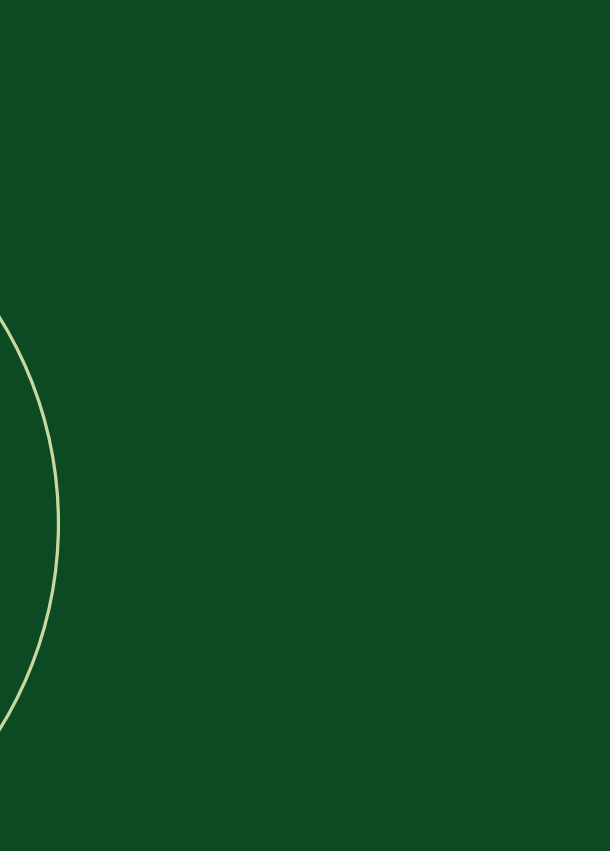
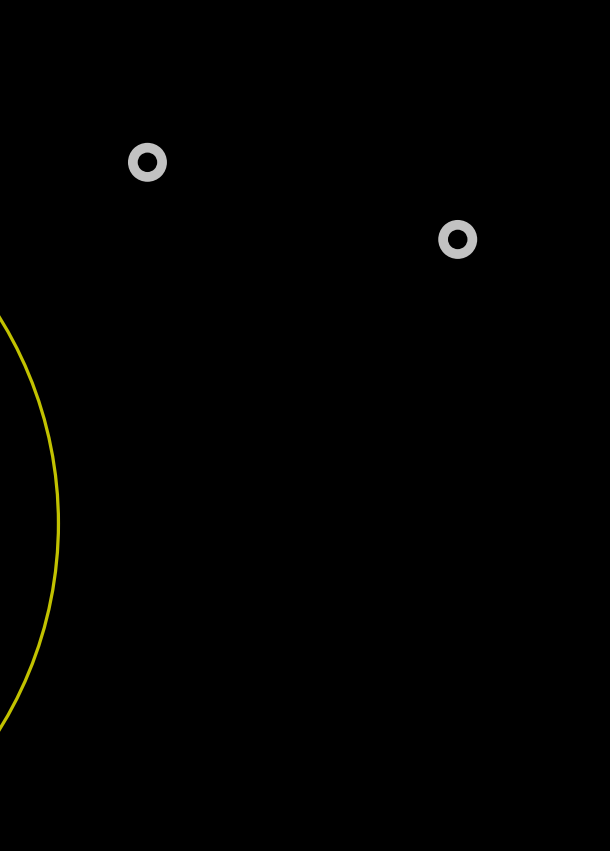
via: none -> (147, 162)
via: none -> (457, 239)

